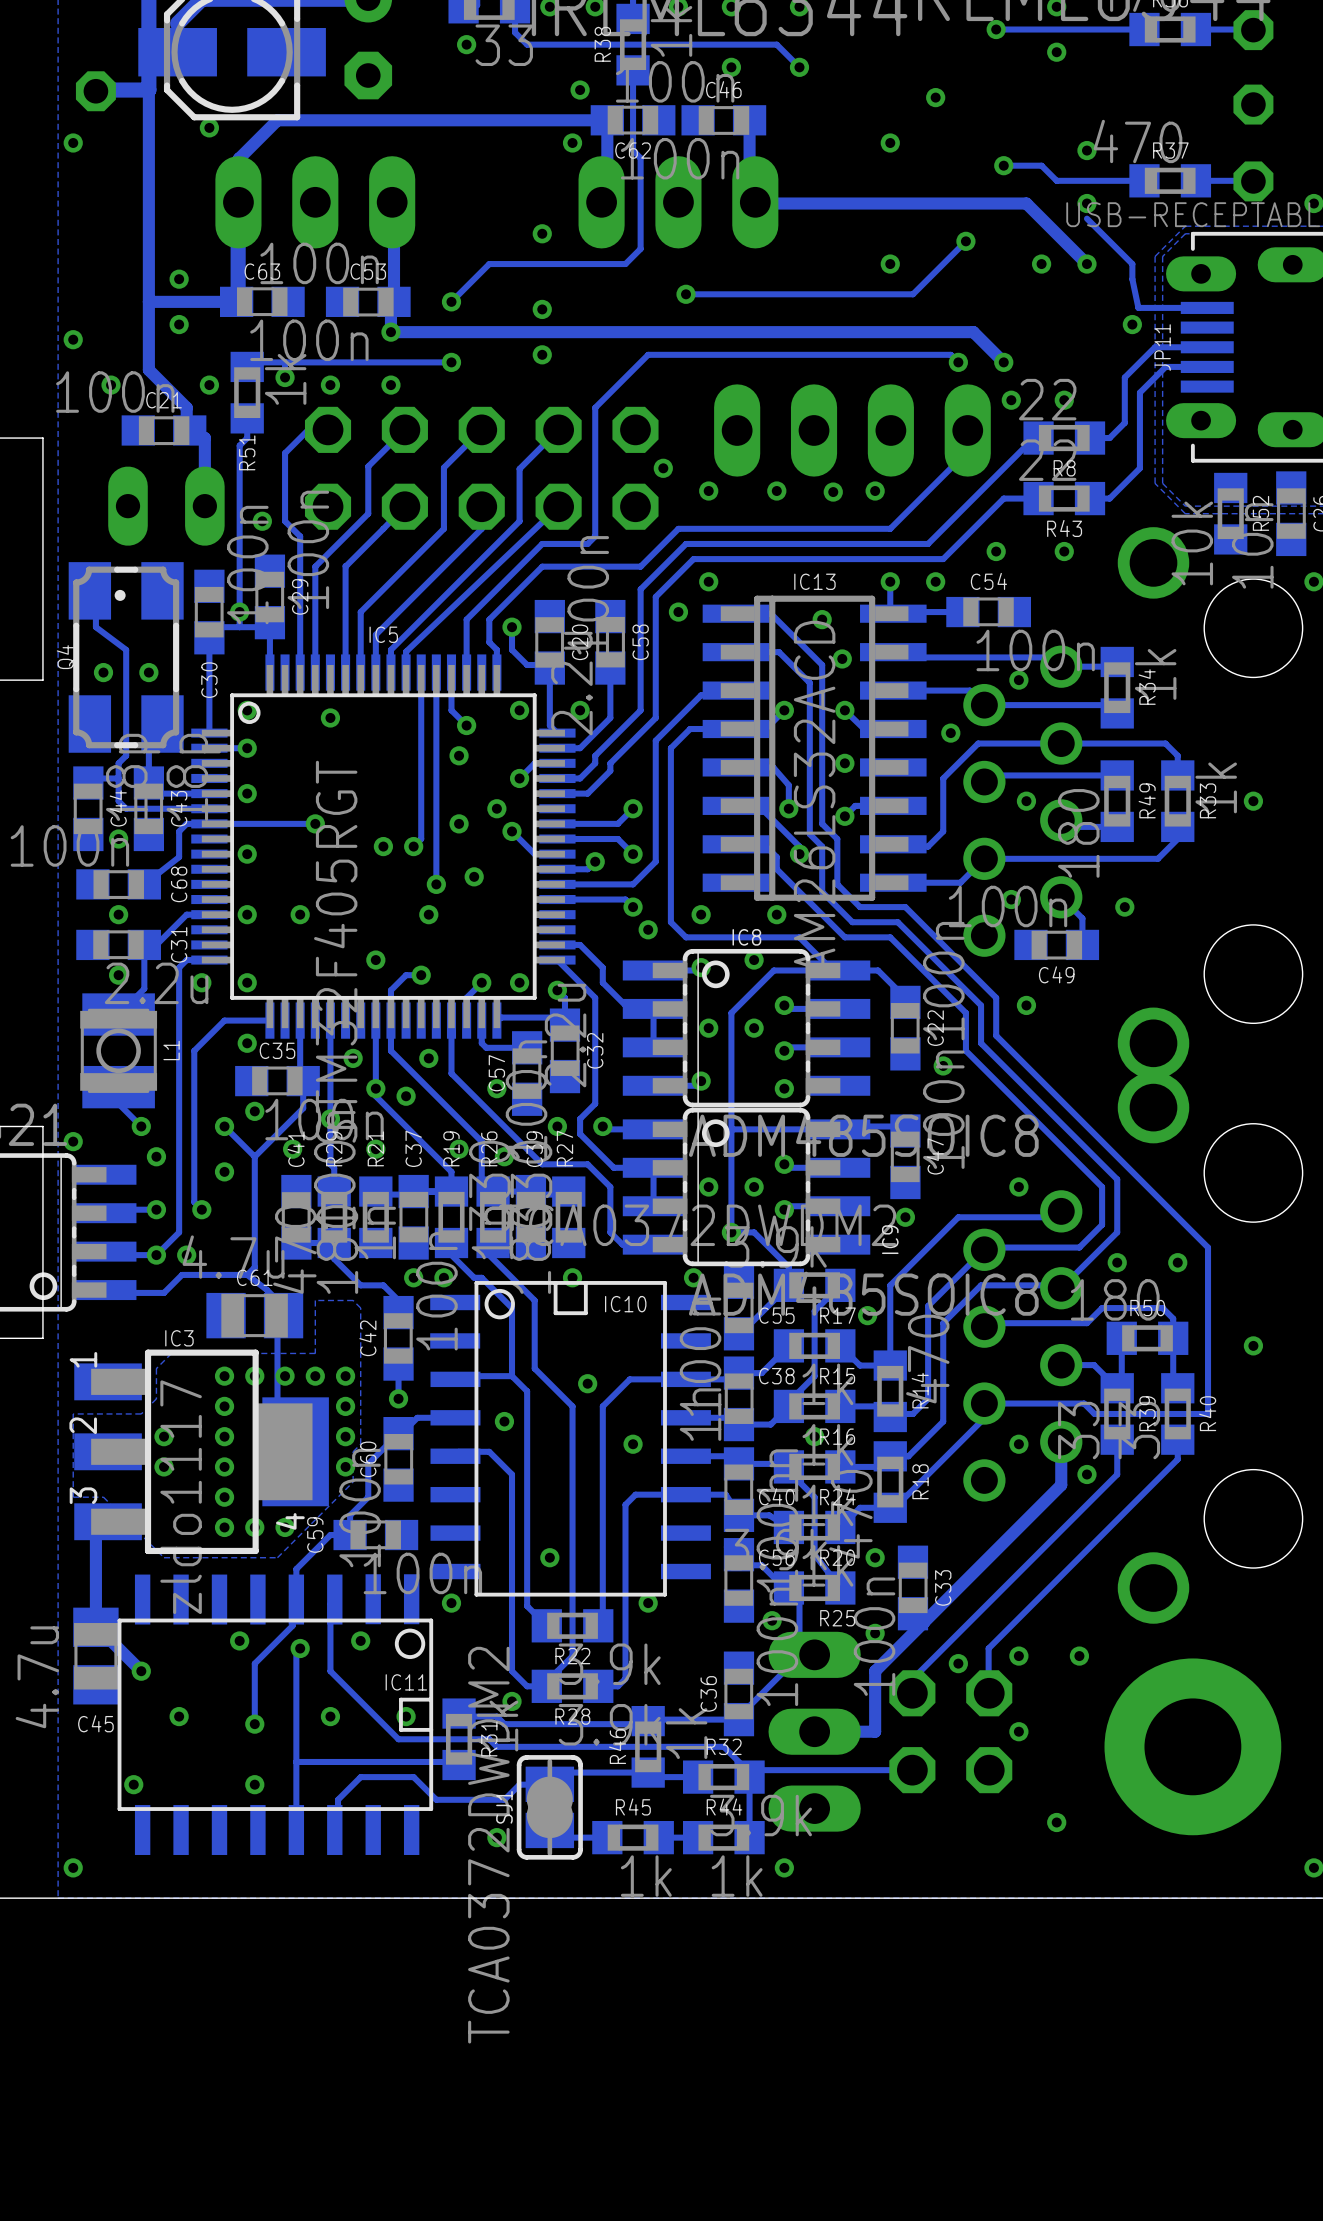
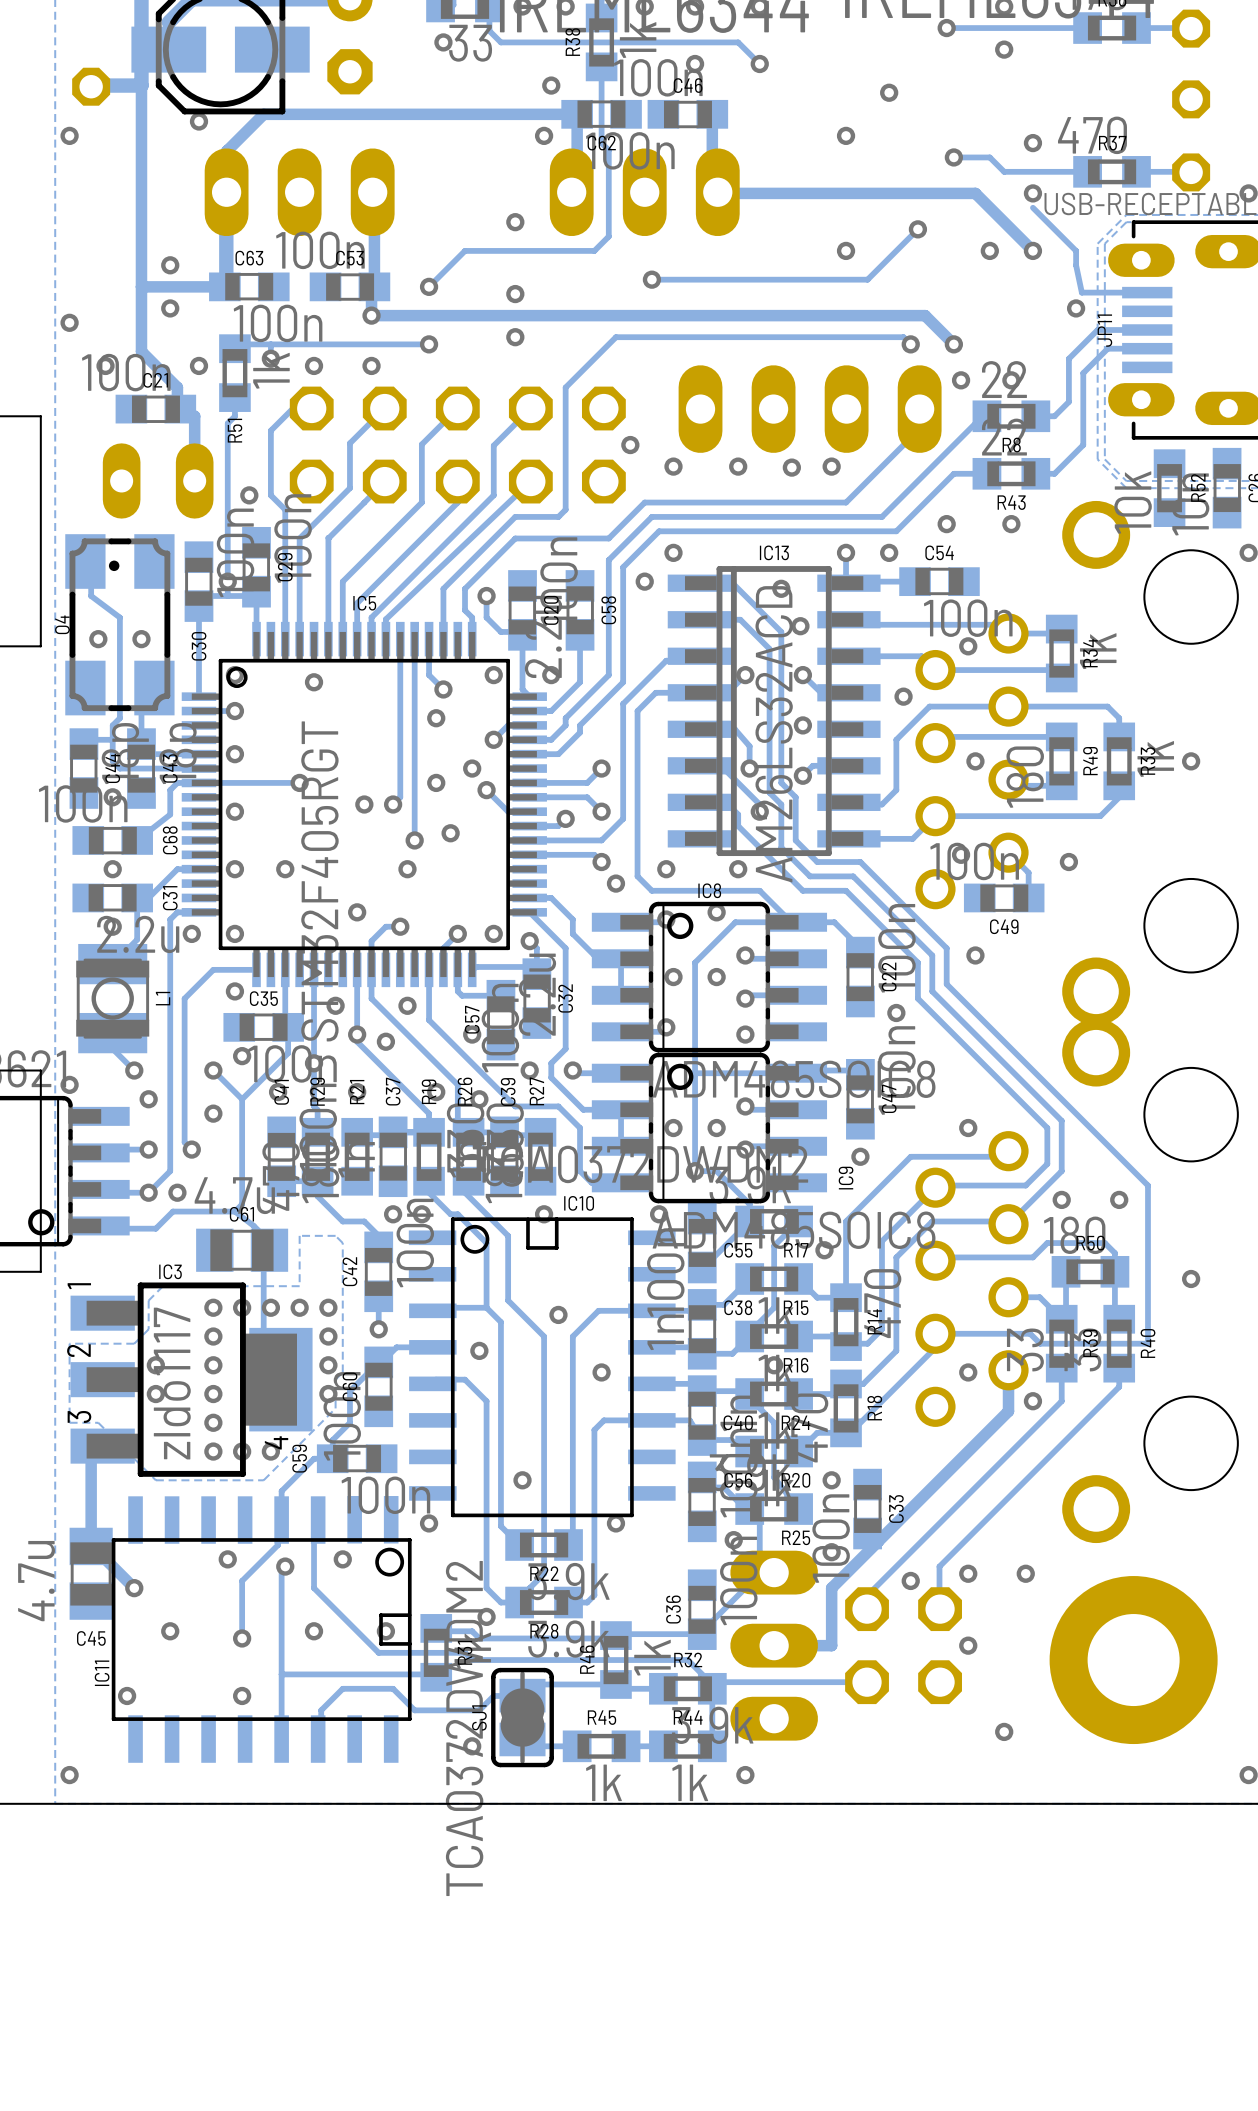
IC10 name position: IC10 (625, 1304) -> IC10 (579, 1203)
IC11 name rotation: 0° (406, 1682) -> 90° counterclockwise (102, 1673)
IC11 name position: IC11 (406, 1682) -> IC11 (102, 1673)

